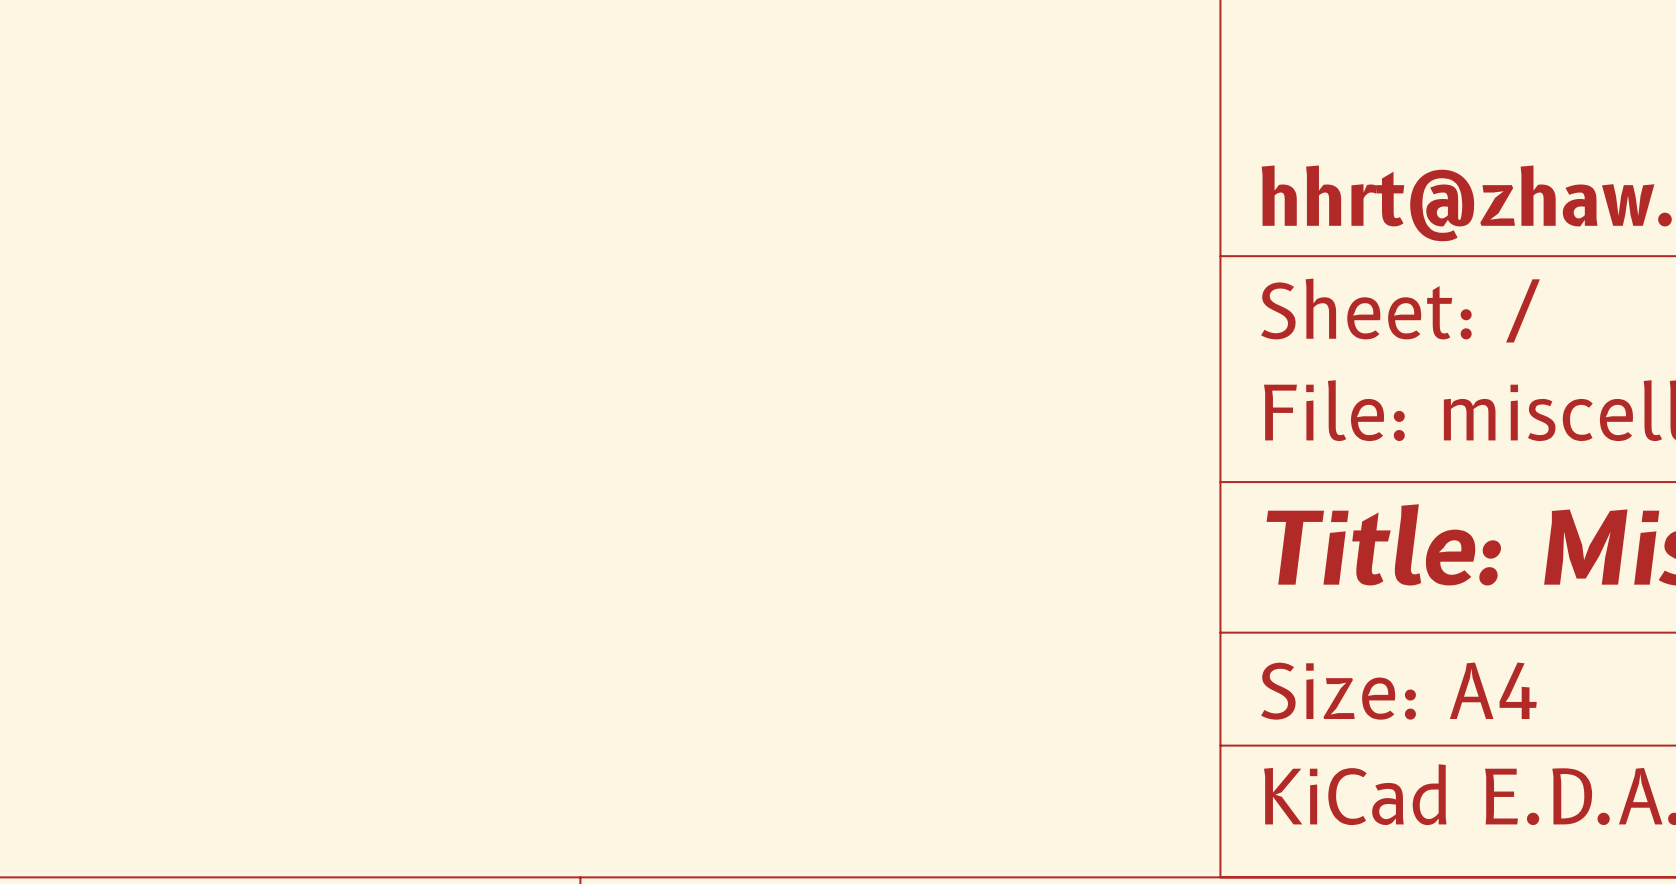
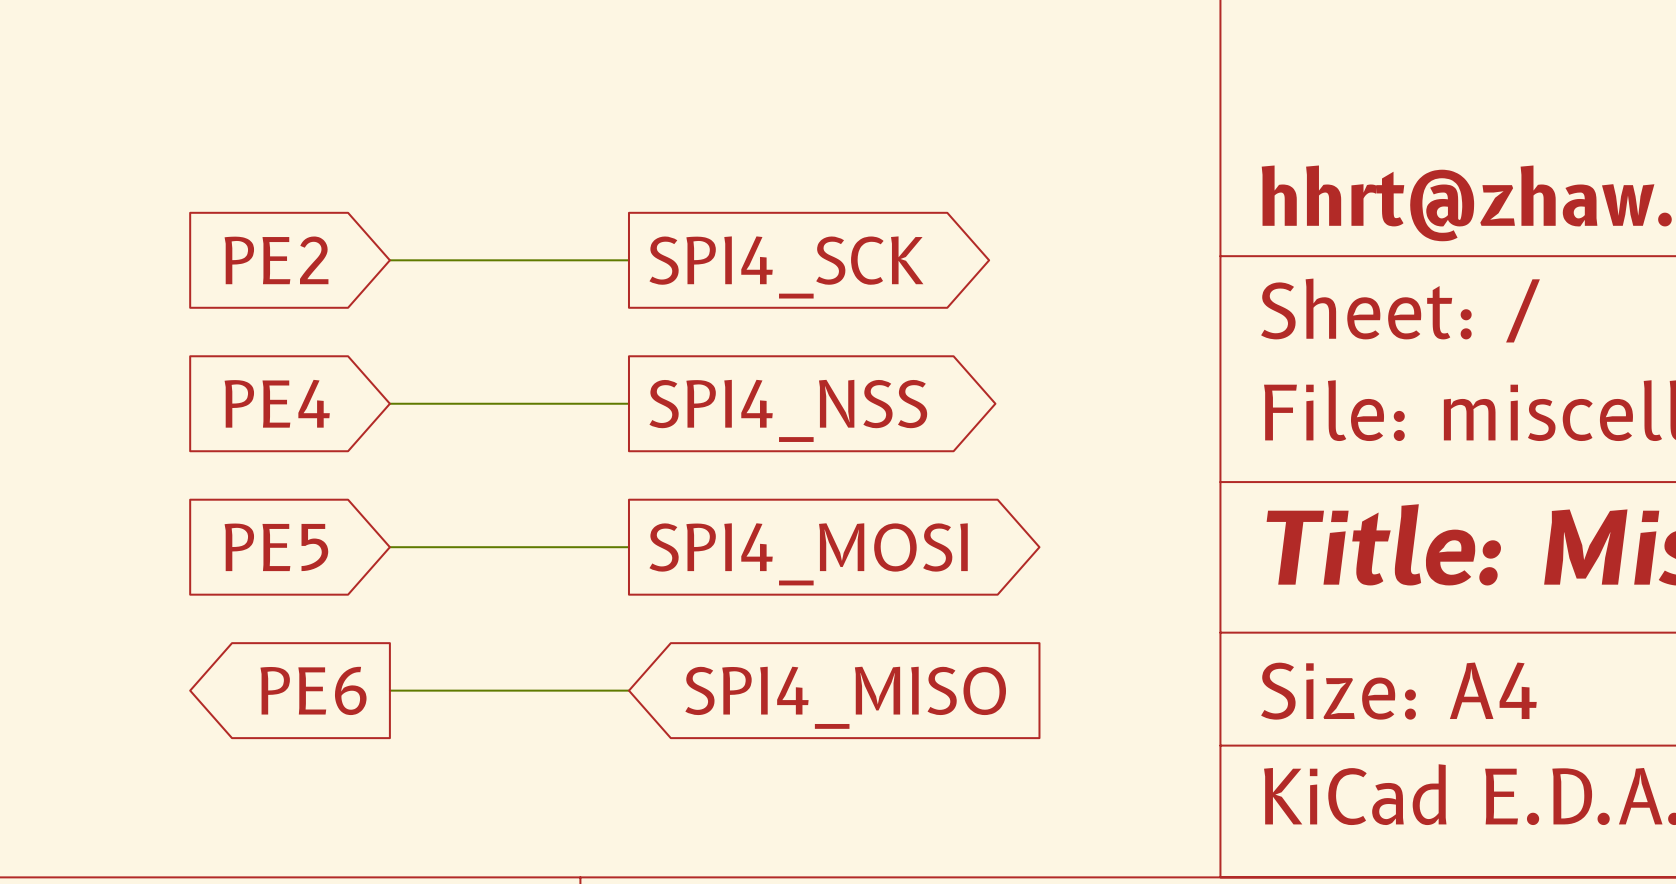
global label: none -> PE2 (276, 260)
wire: none -> (389, 260) (628, 260)
global label: none -> SPI4_SCK (786, 267)
global label: none -> PE4 (277, 403)
wire: none -> (389, 403) (628, 403)
global label: none -> SPI4_NSS (788, 410)
global label: none -> PE5 (276, 547)
wire: none -> (389, 547) (628, 547)
global label: none -> SPI4_MOSI (808, 554)
global label: none -> PE6 (313, 690)
wire: none -> (389, 690) (628, 690)
global label: none -> SPI4_MISO (845, 697)

